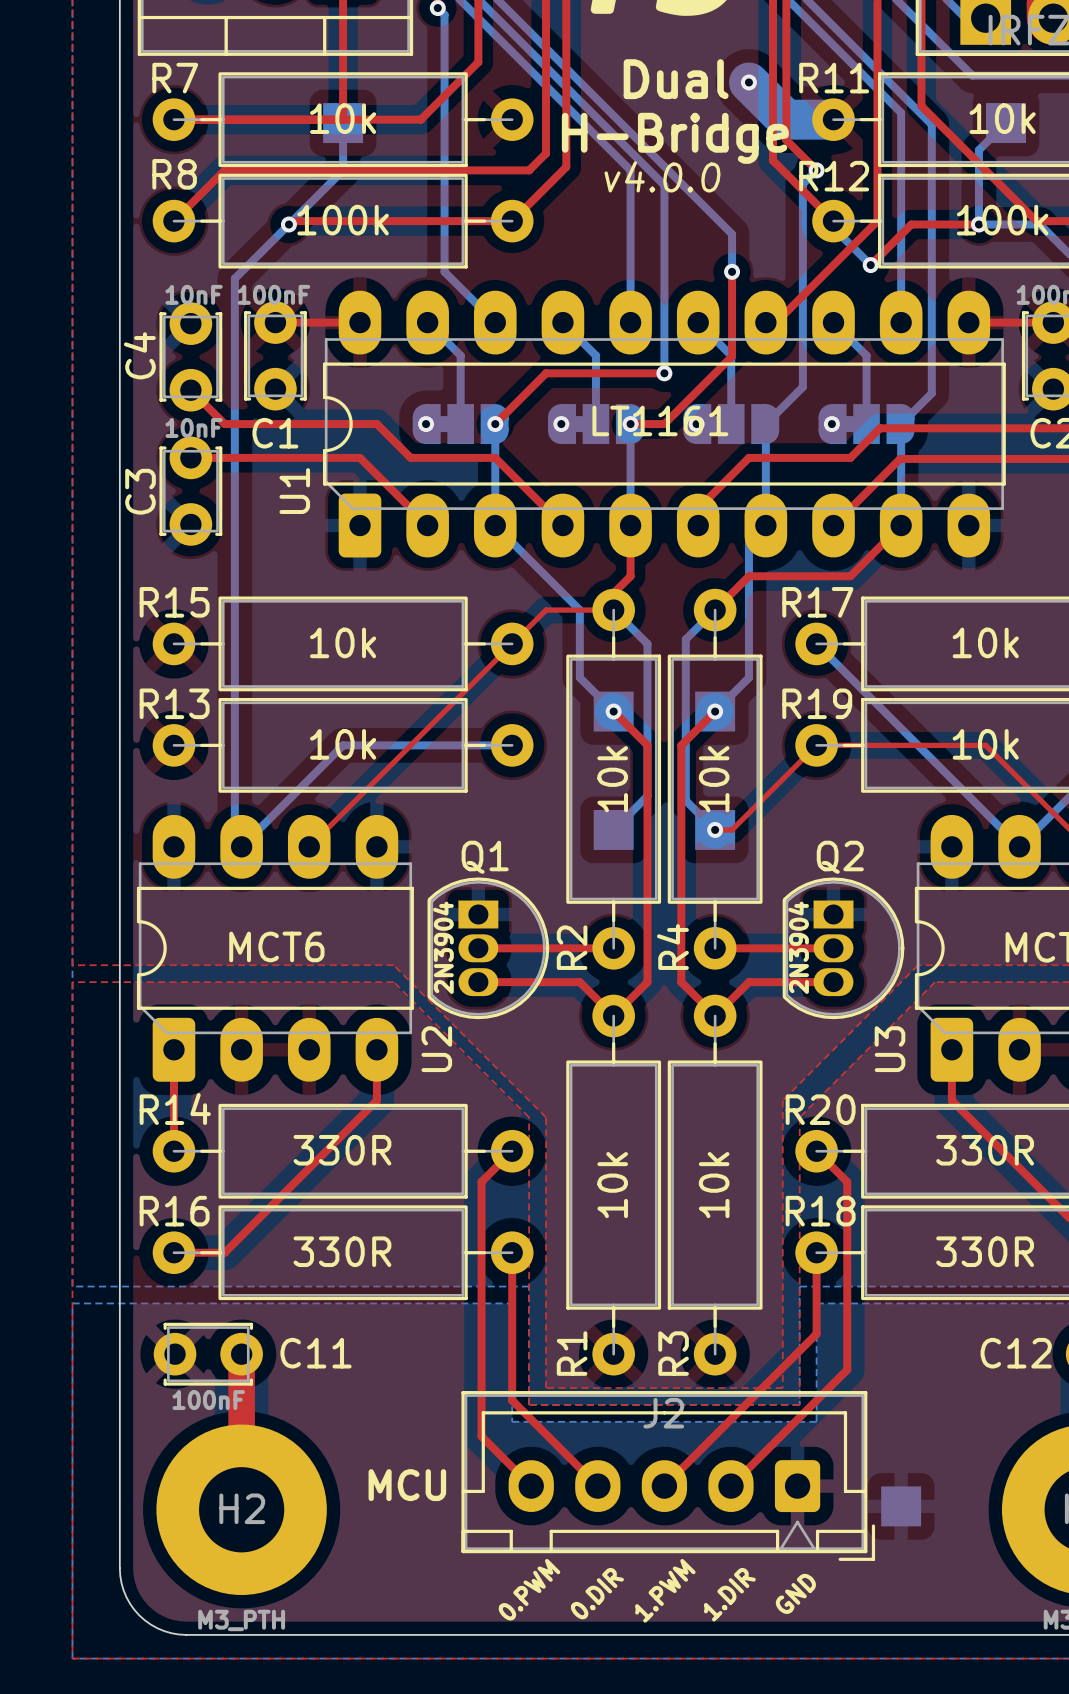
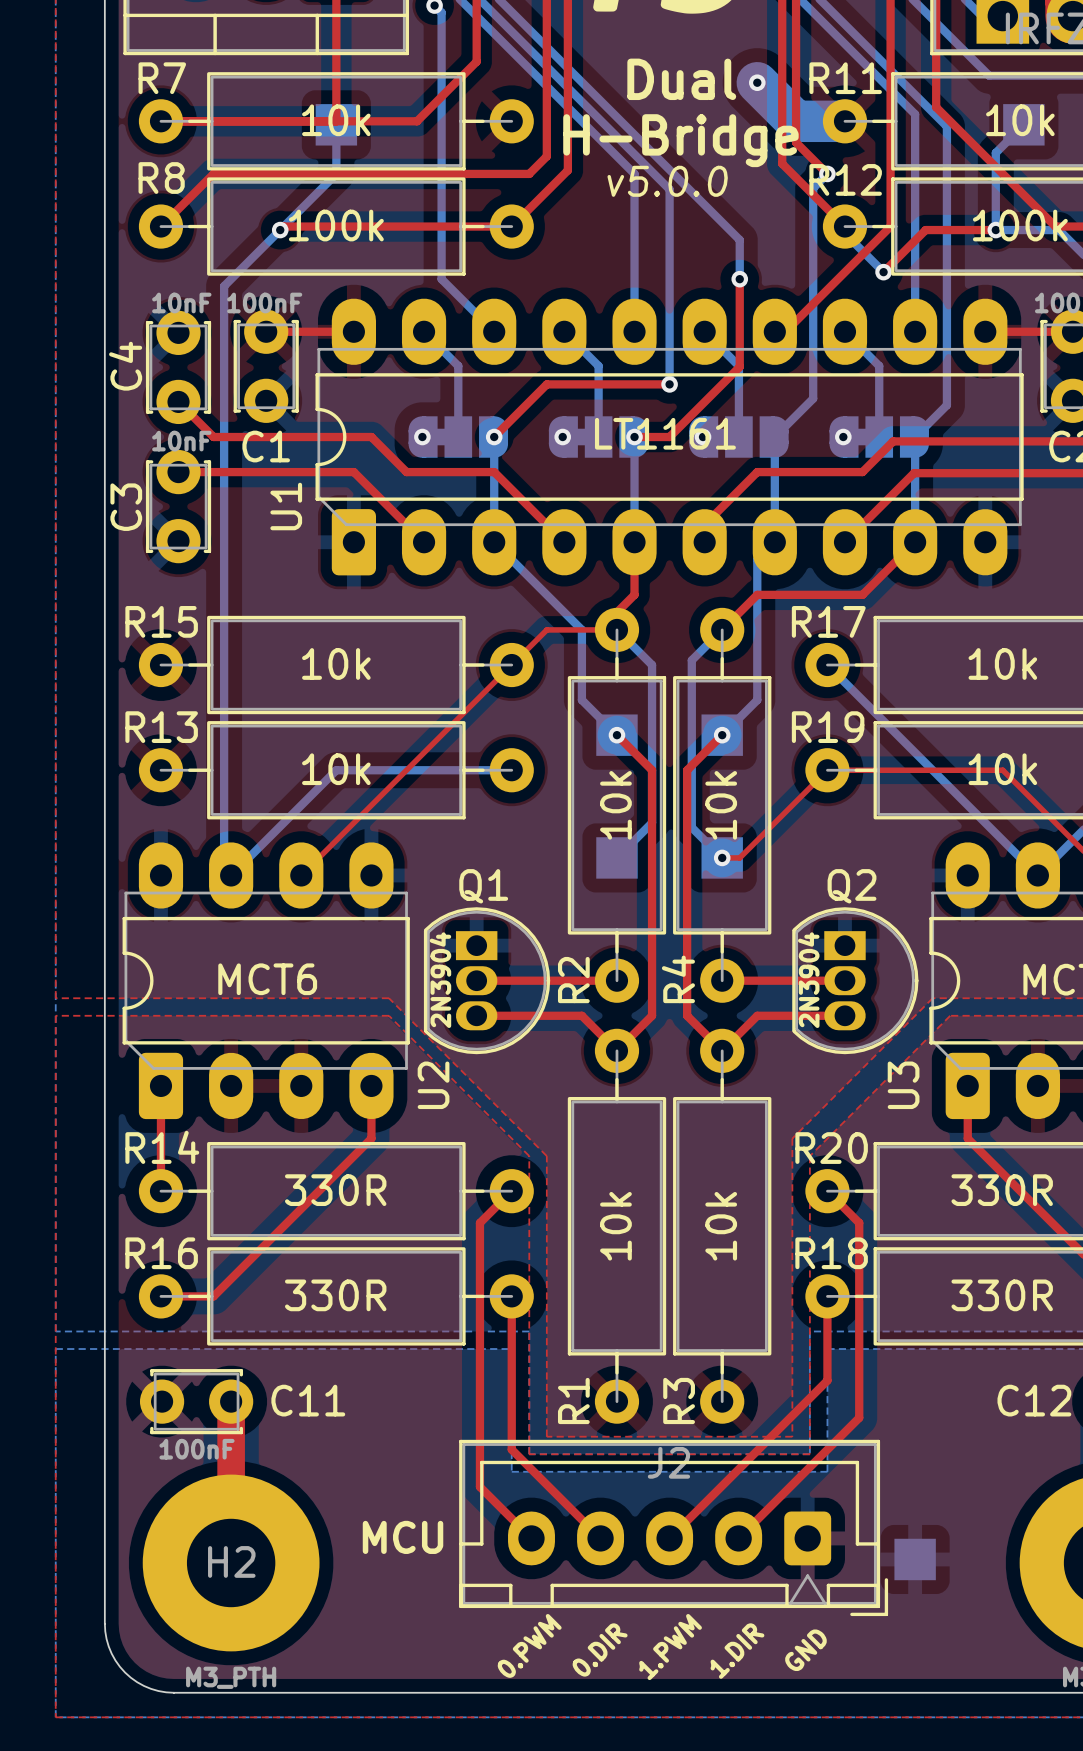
text: v4.0.0 (662, 176) -> v5.0.0 (667, 181)

